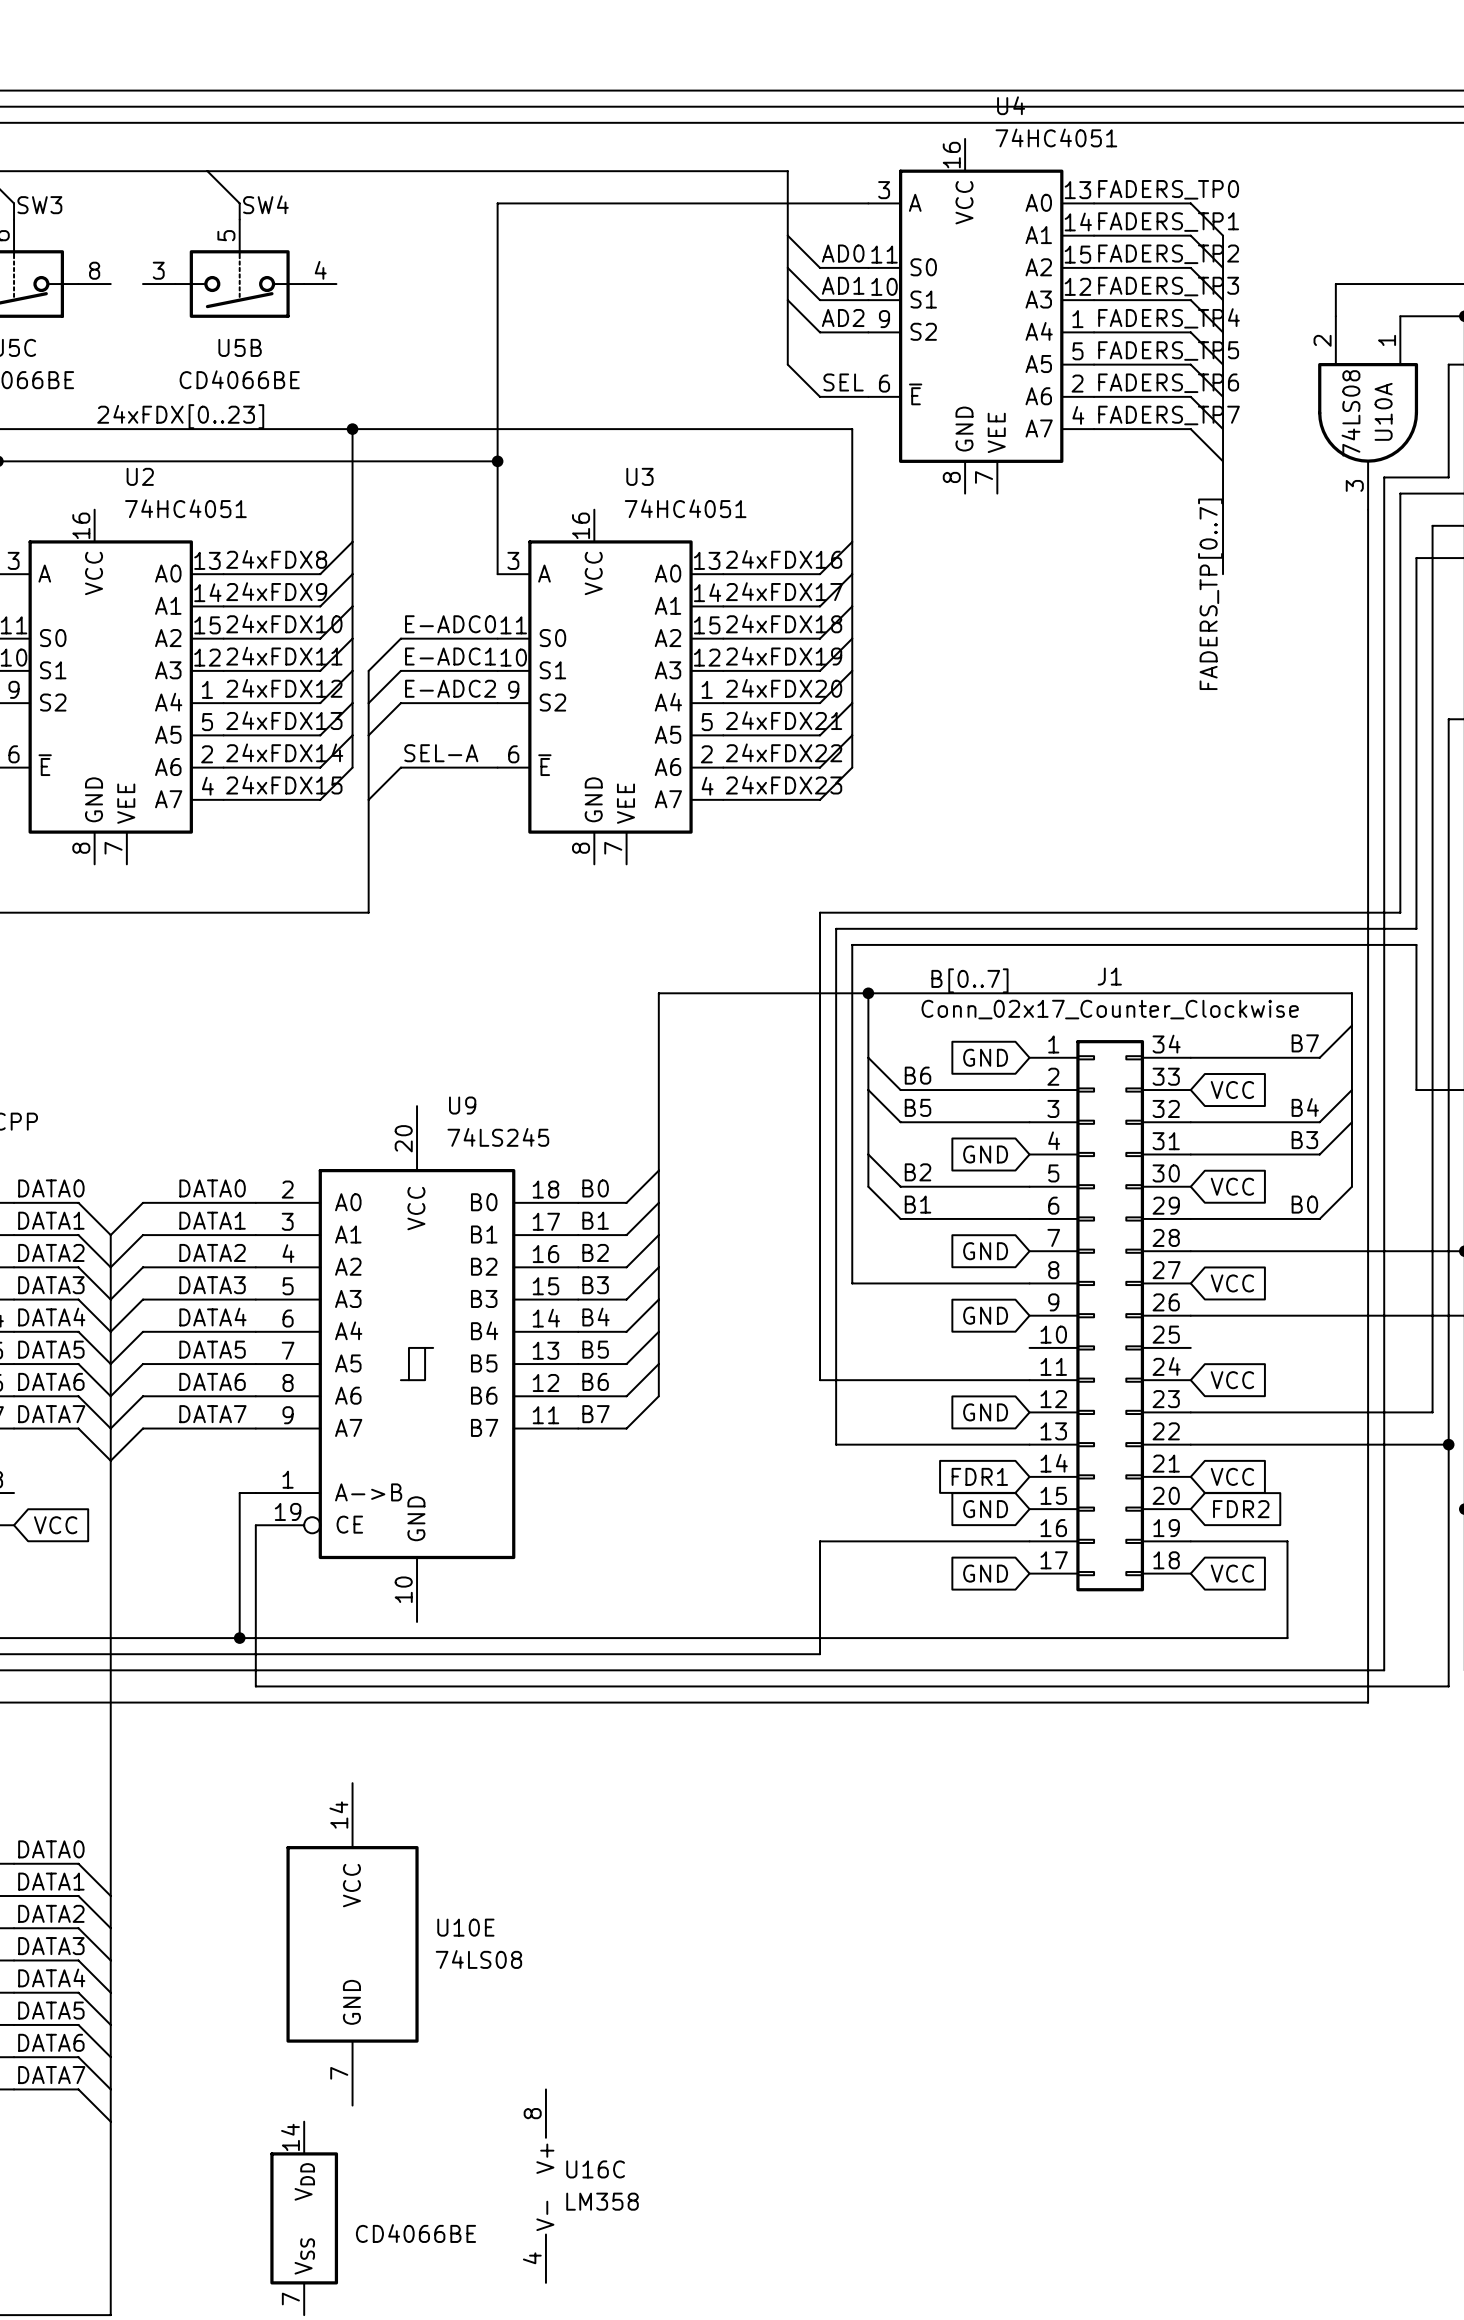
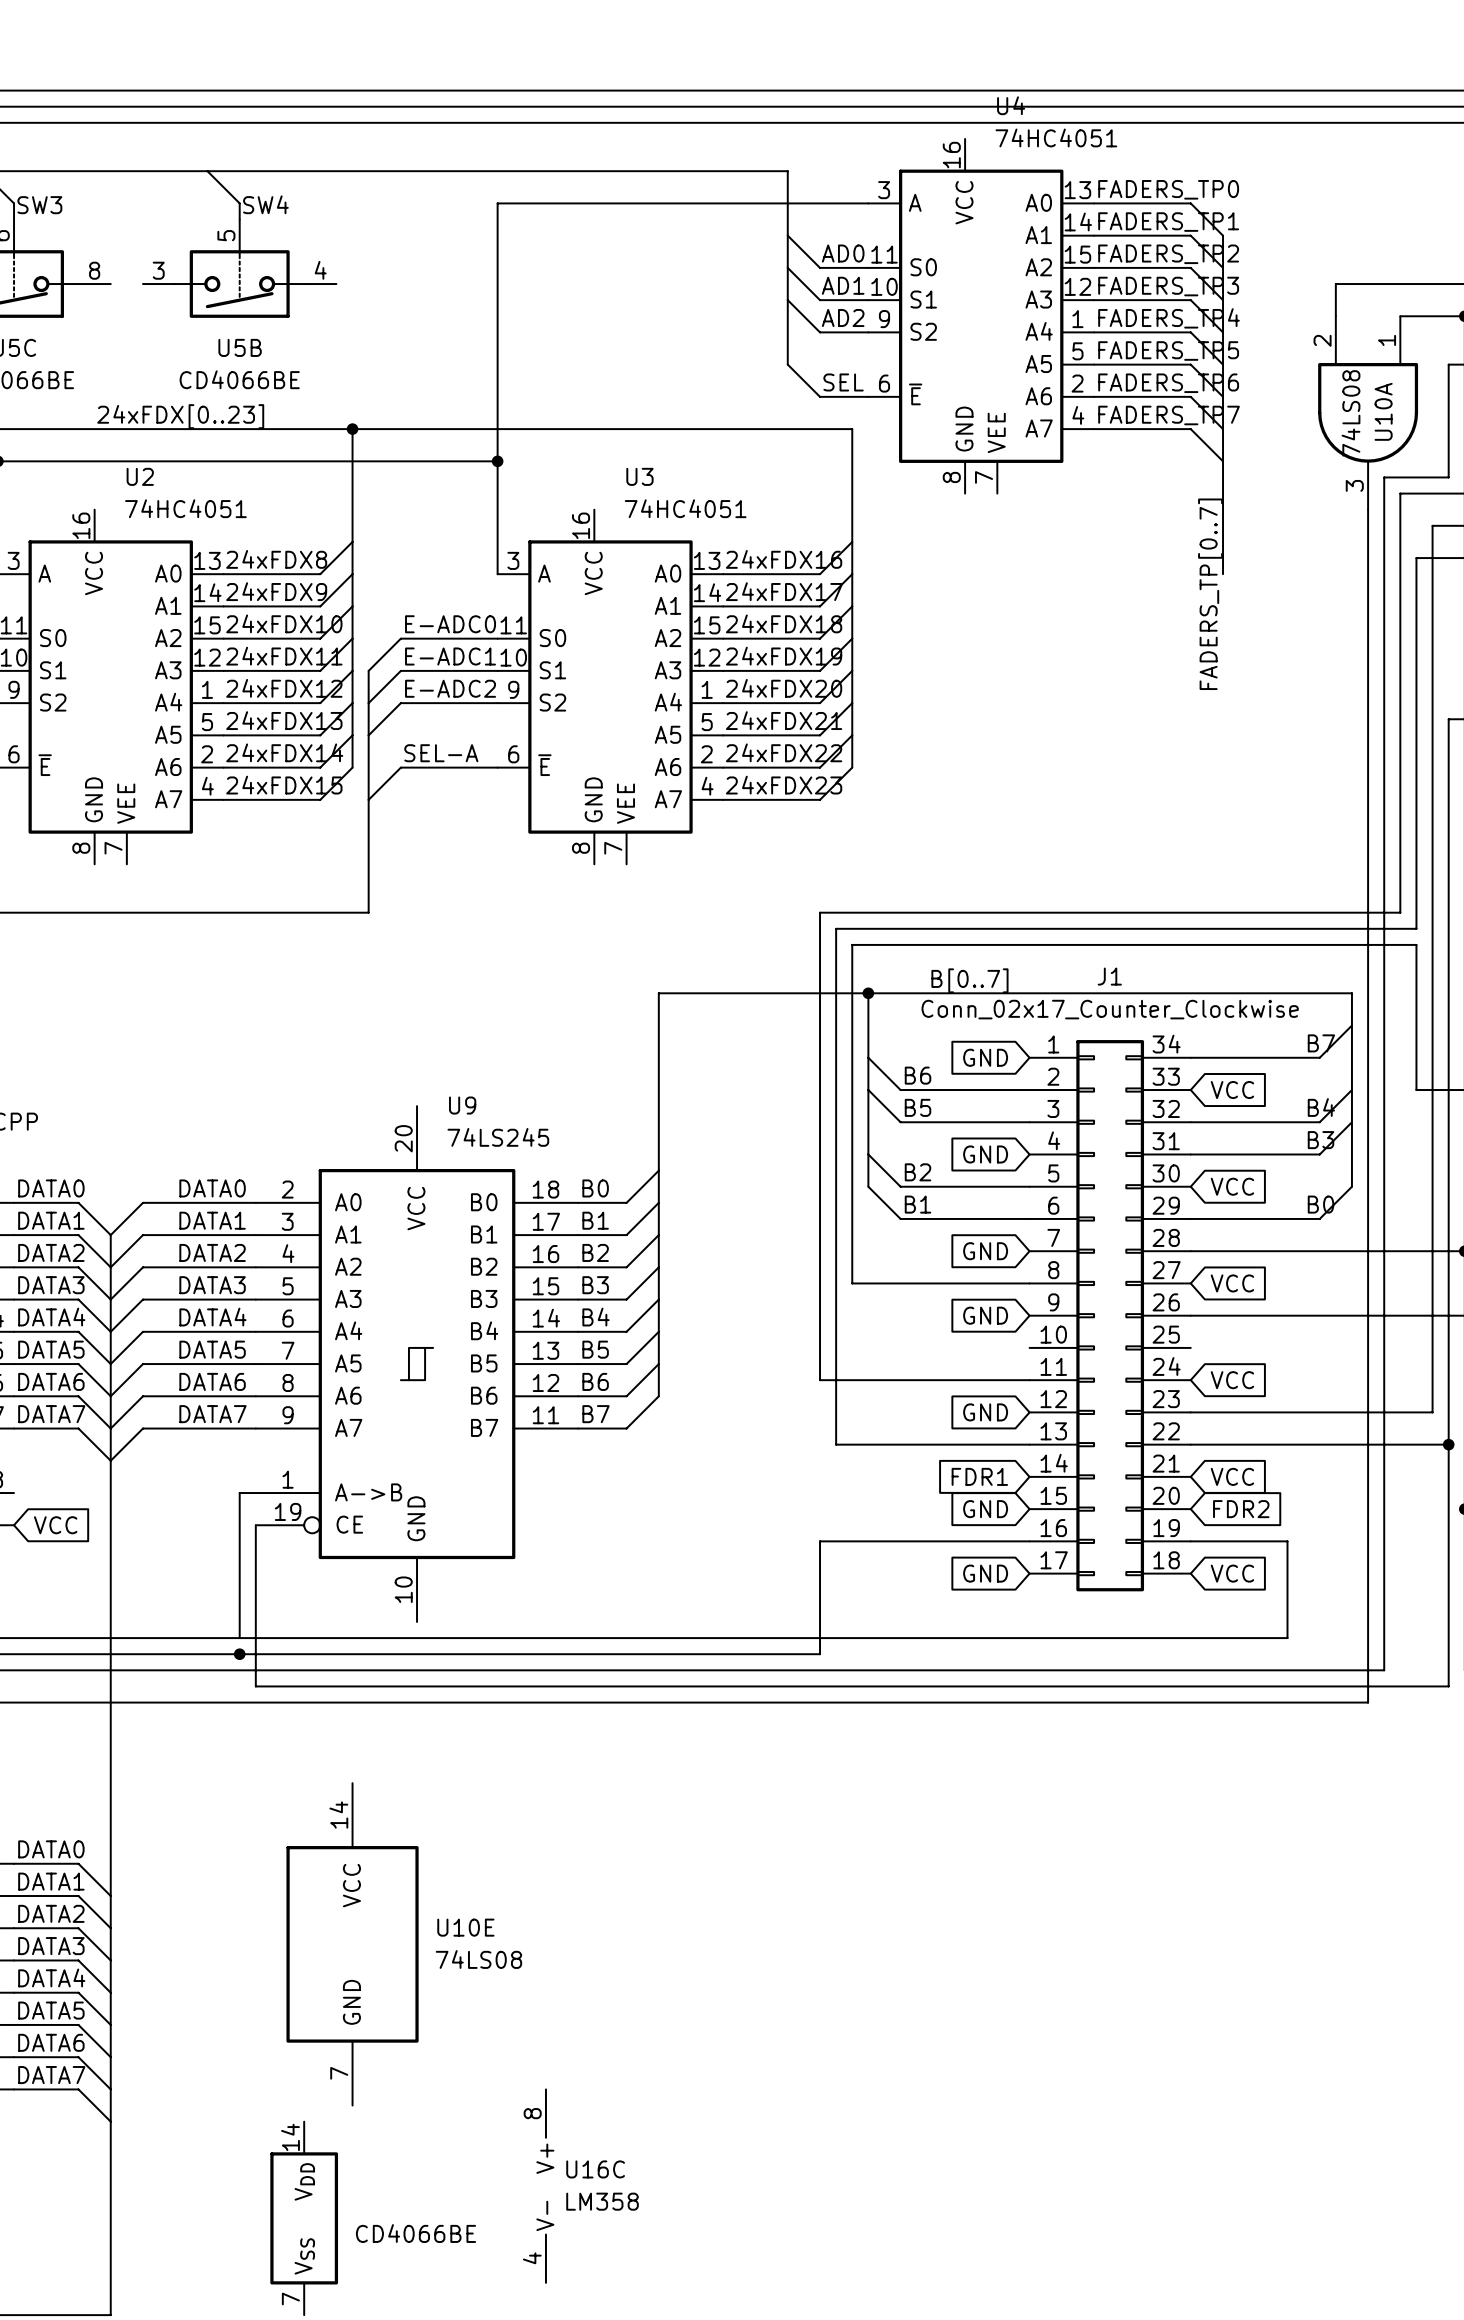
label position: B7 (1305, 1043) -> B7 (1321, 1043)
label position: B4 (1305, 1107) -> B4 (1321, 1107)
label position: B3 (1304, 1140) -> B3 (1321, 1140)
label position: B0 (1304, 1204) -> B0 (1321, 1204)
junction position: (239, 1638) -> (239, 1654)

